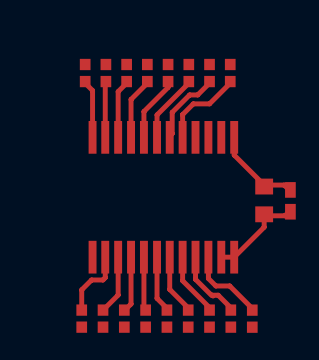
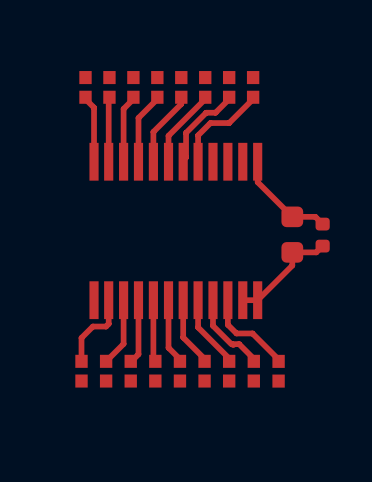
part footprint: [255, 178, 274, 223] -> [281, 206, 304, 263]
part footprint: [285, 182, 296, 220] -> [315, 217, 330, 253]

